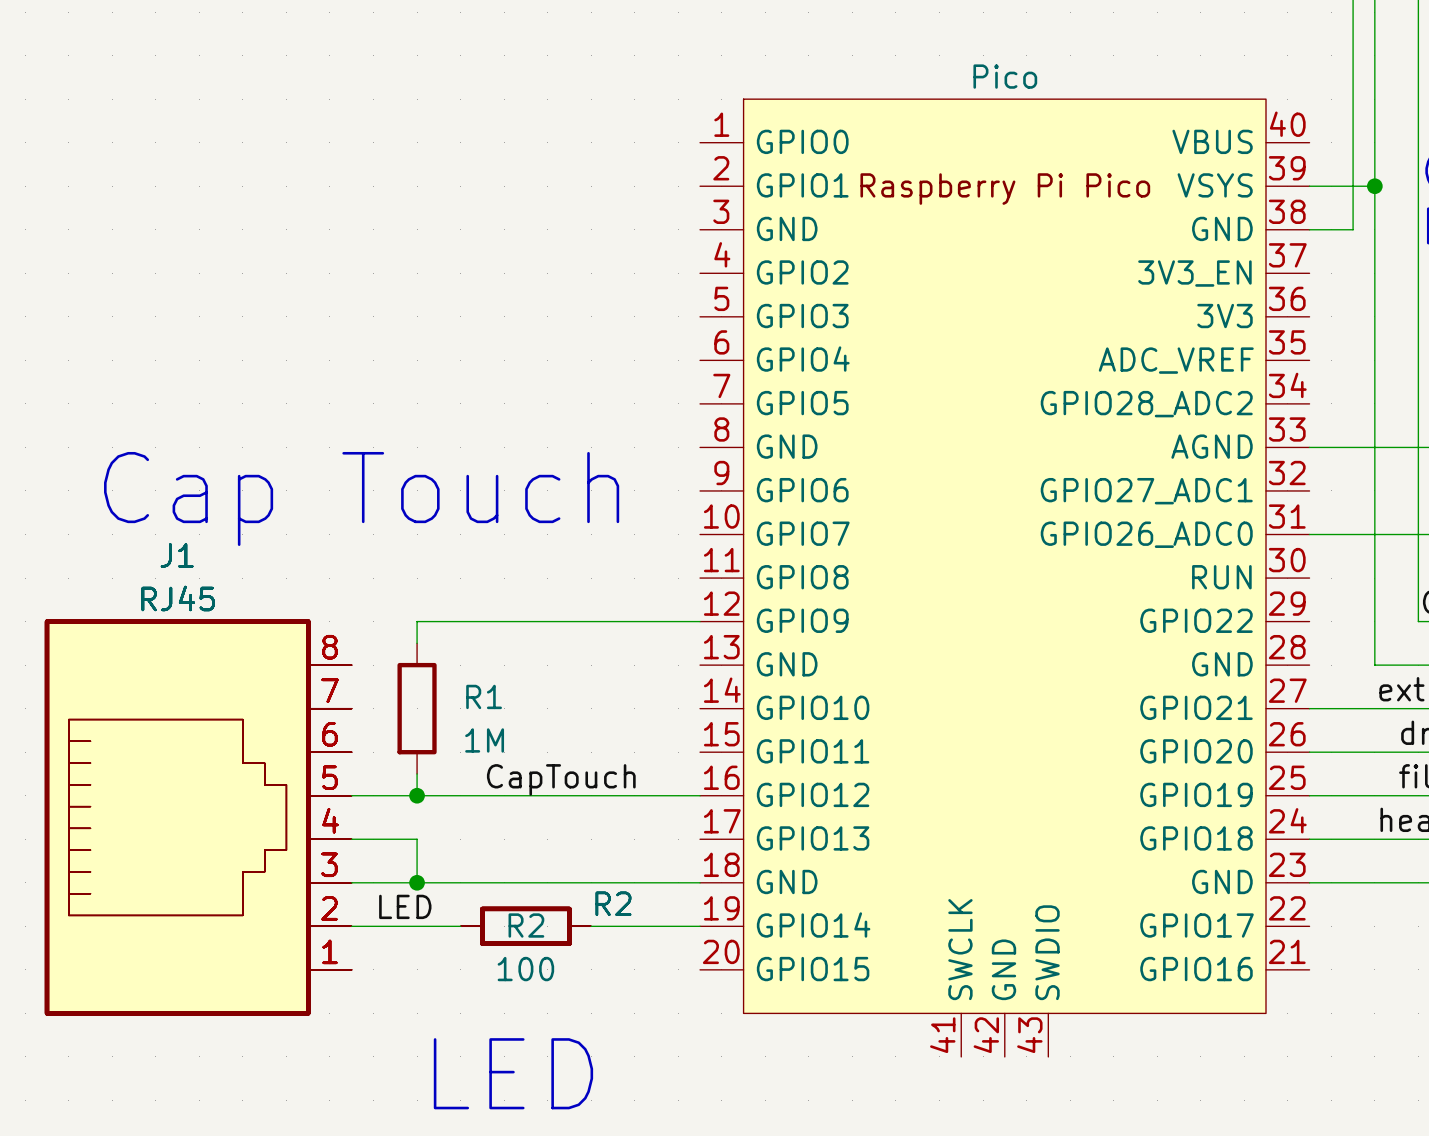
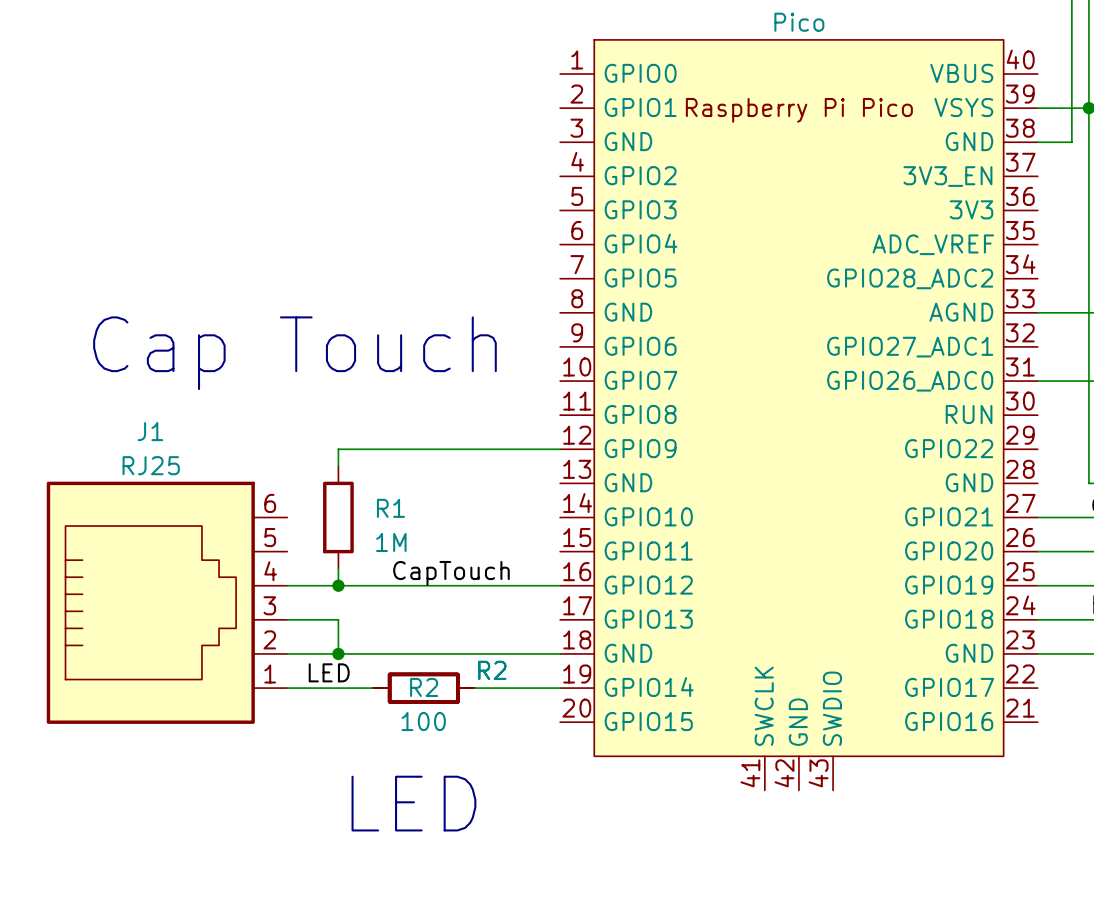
J1 name position: J1 (177, 555) -> J1 (150, 431)
J1 value: RJ45 (178, 598) -> RJ25 (151, 465)
J1 symbol: [44, 619, 352, 1016] -> [46, 481, 288, 724]

